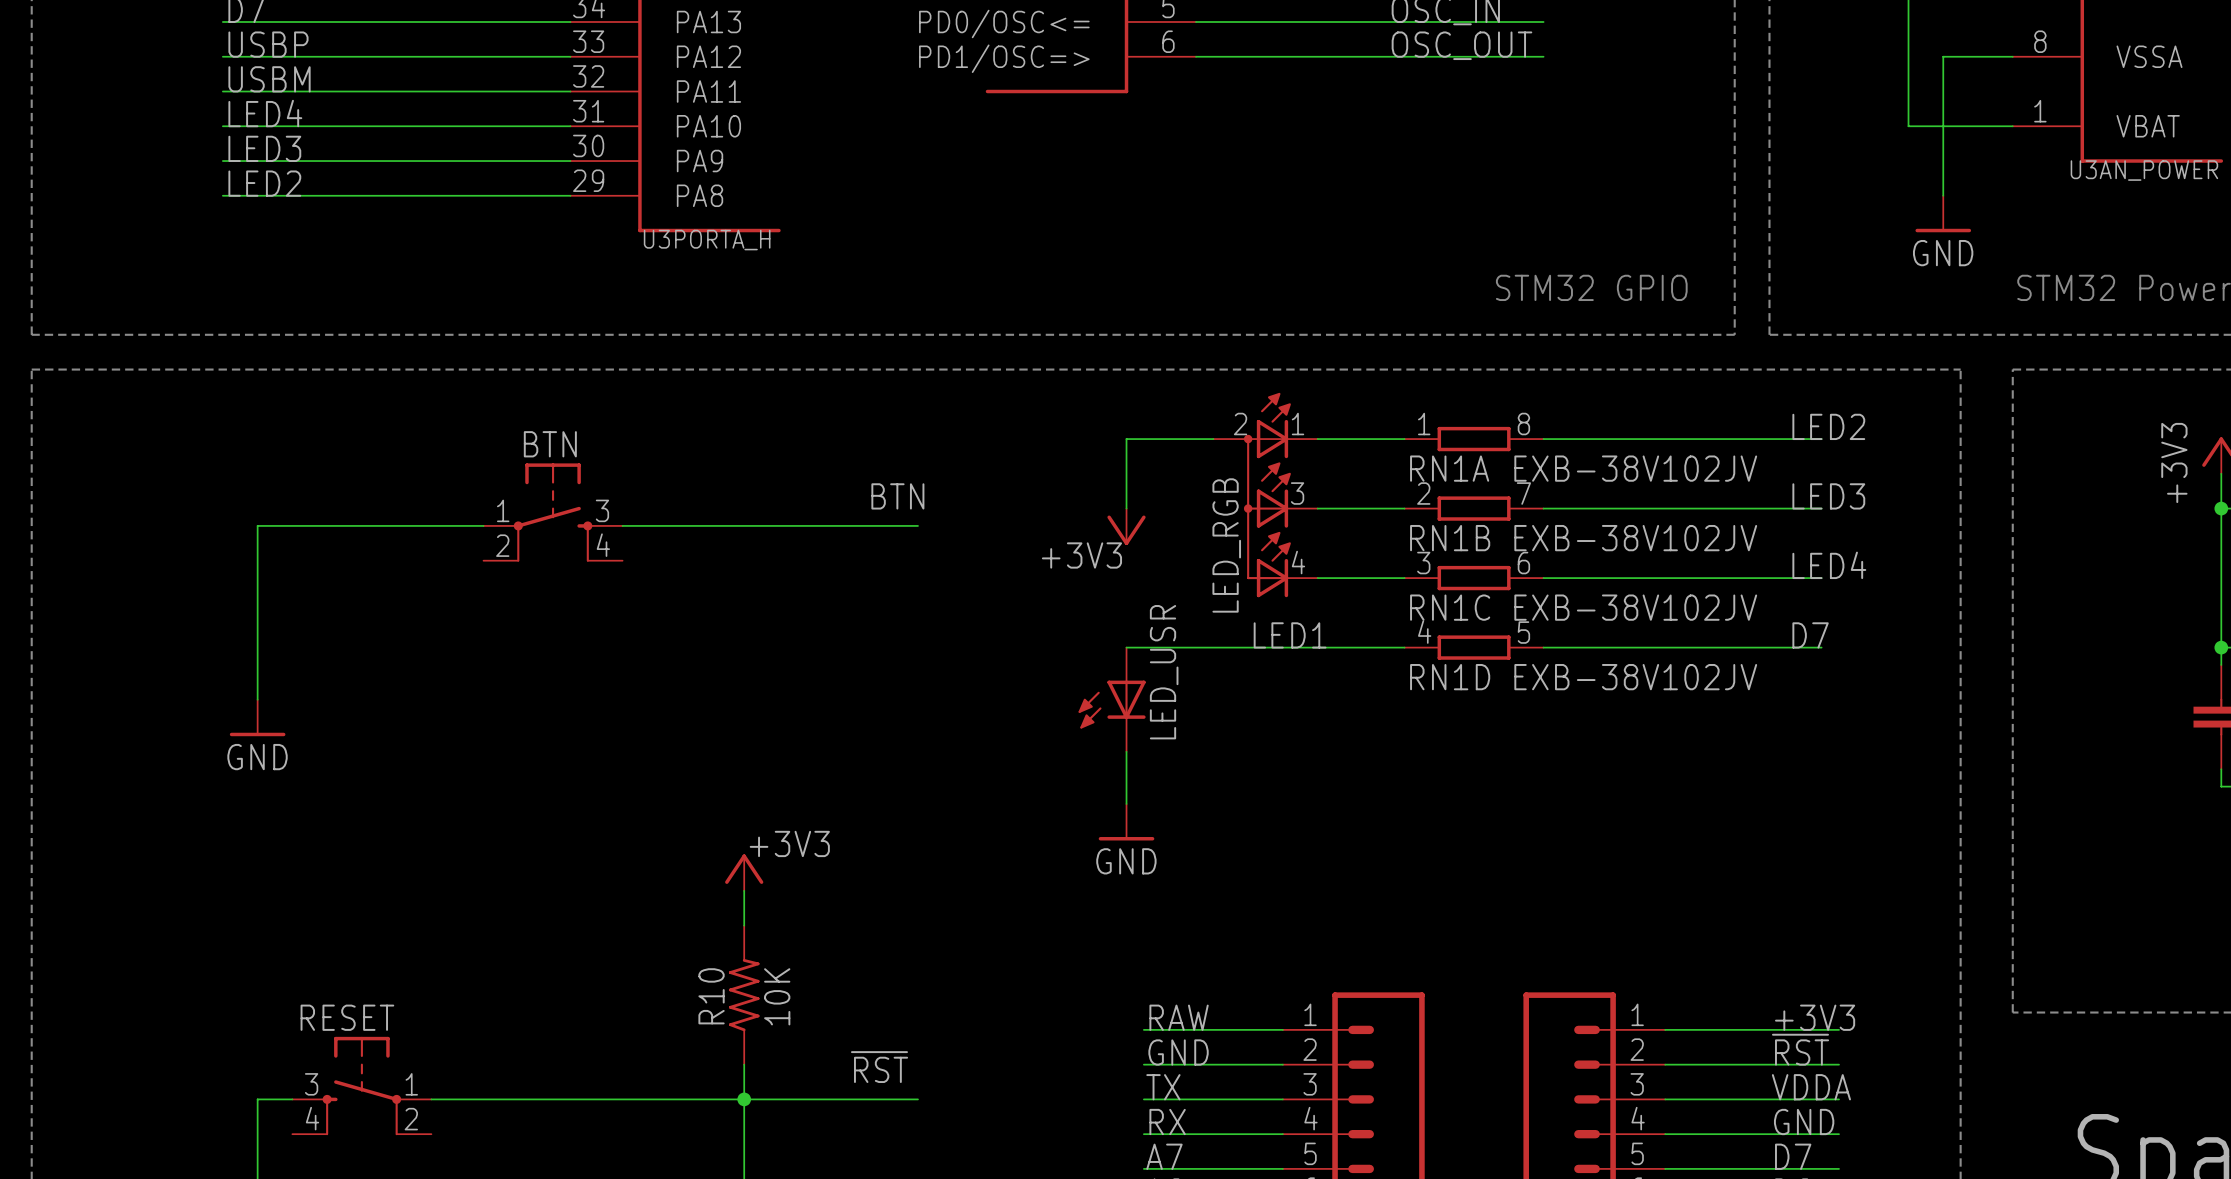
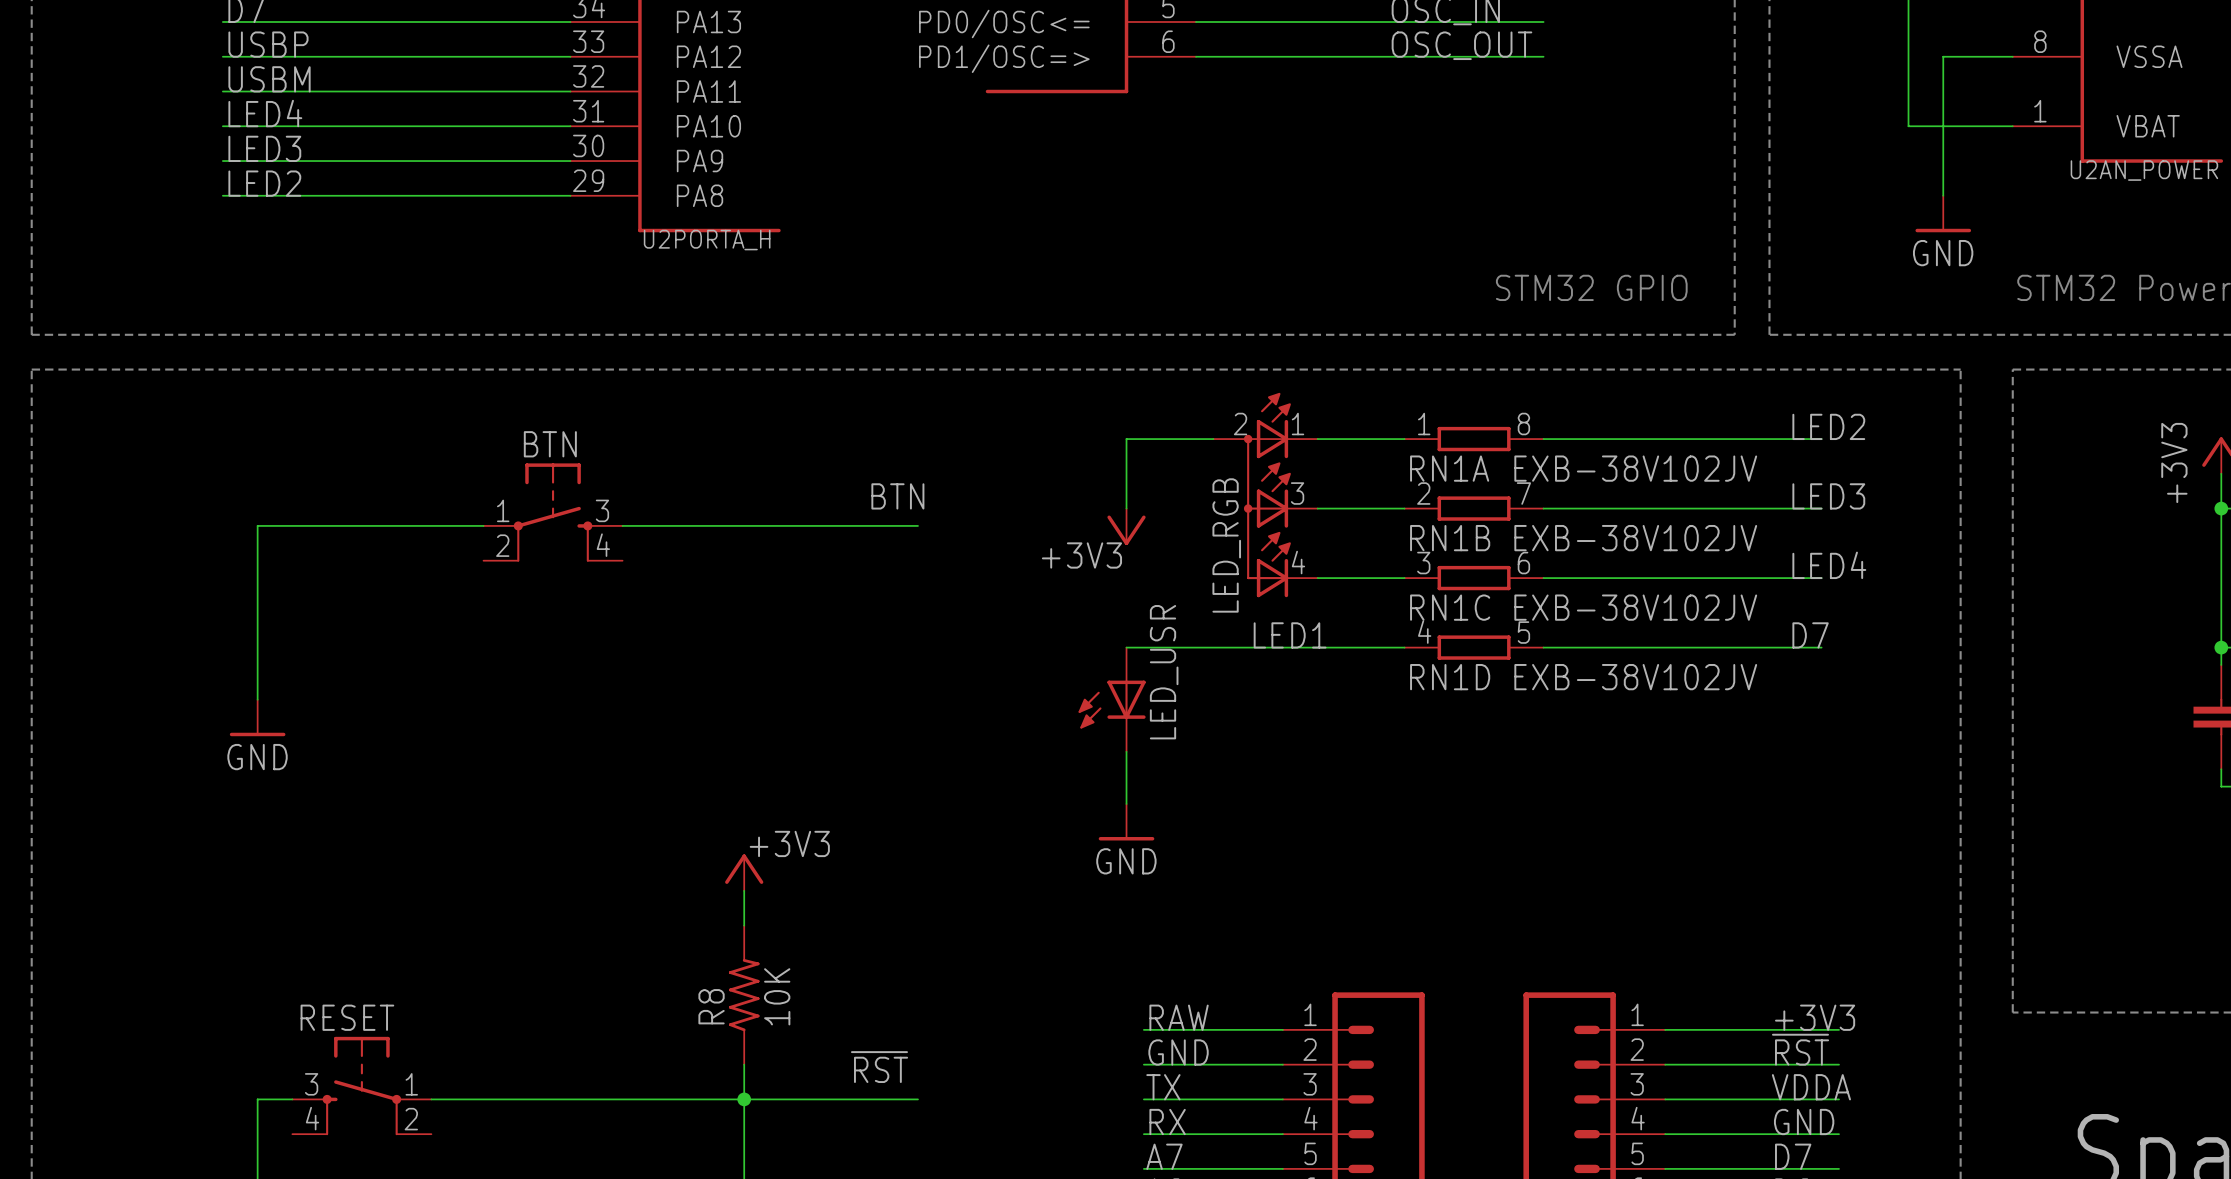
U3AN_POWER name: U3AN_POWER (2144, 170) -> U2AN_POWER (2144, 170)
U3PORTA_H name: U3PORTA_H (707, 240) -> U2PORTA_H (707, 240)
R10 name: R10 (711, 996) -> R8 (711, 1006)

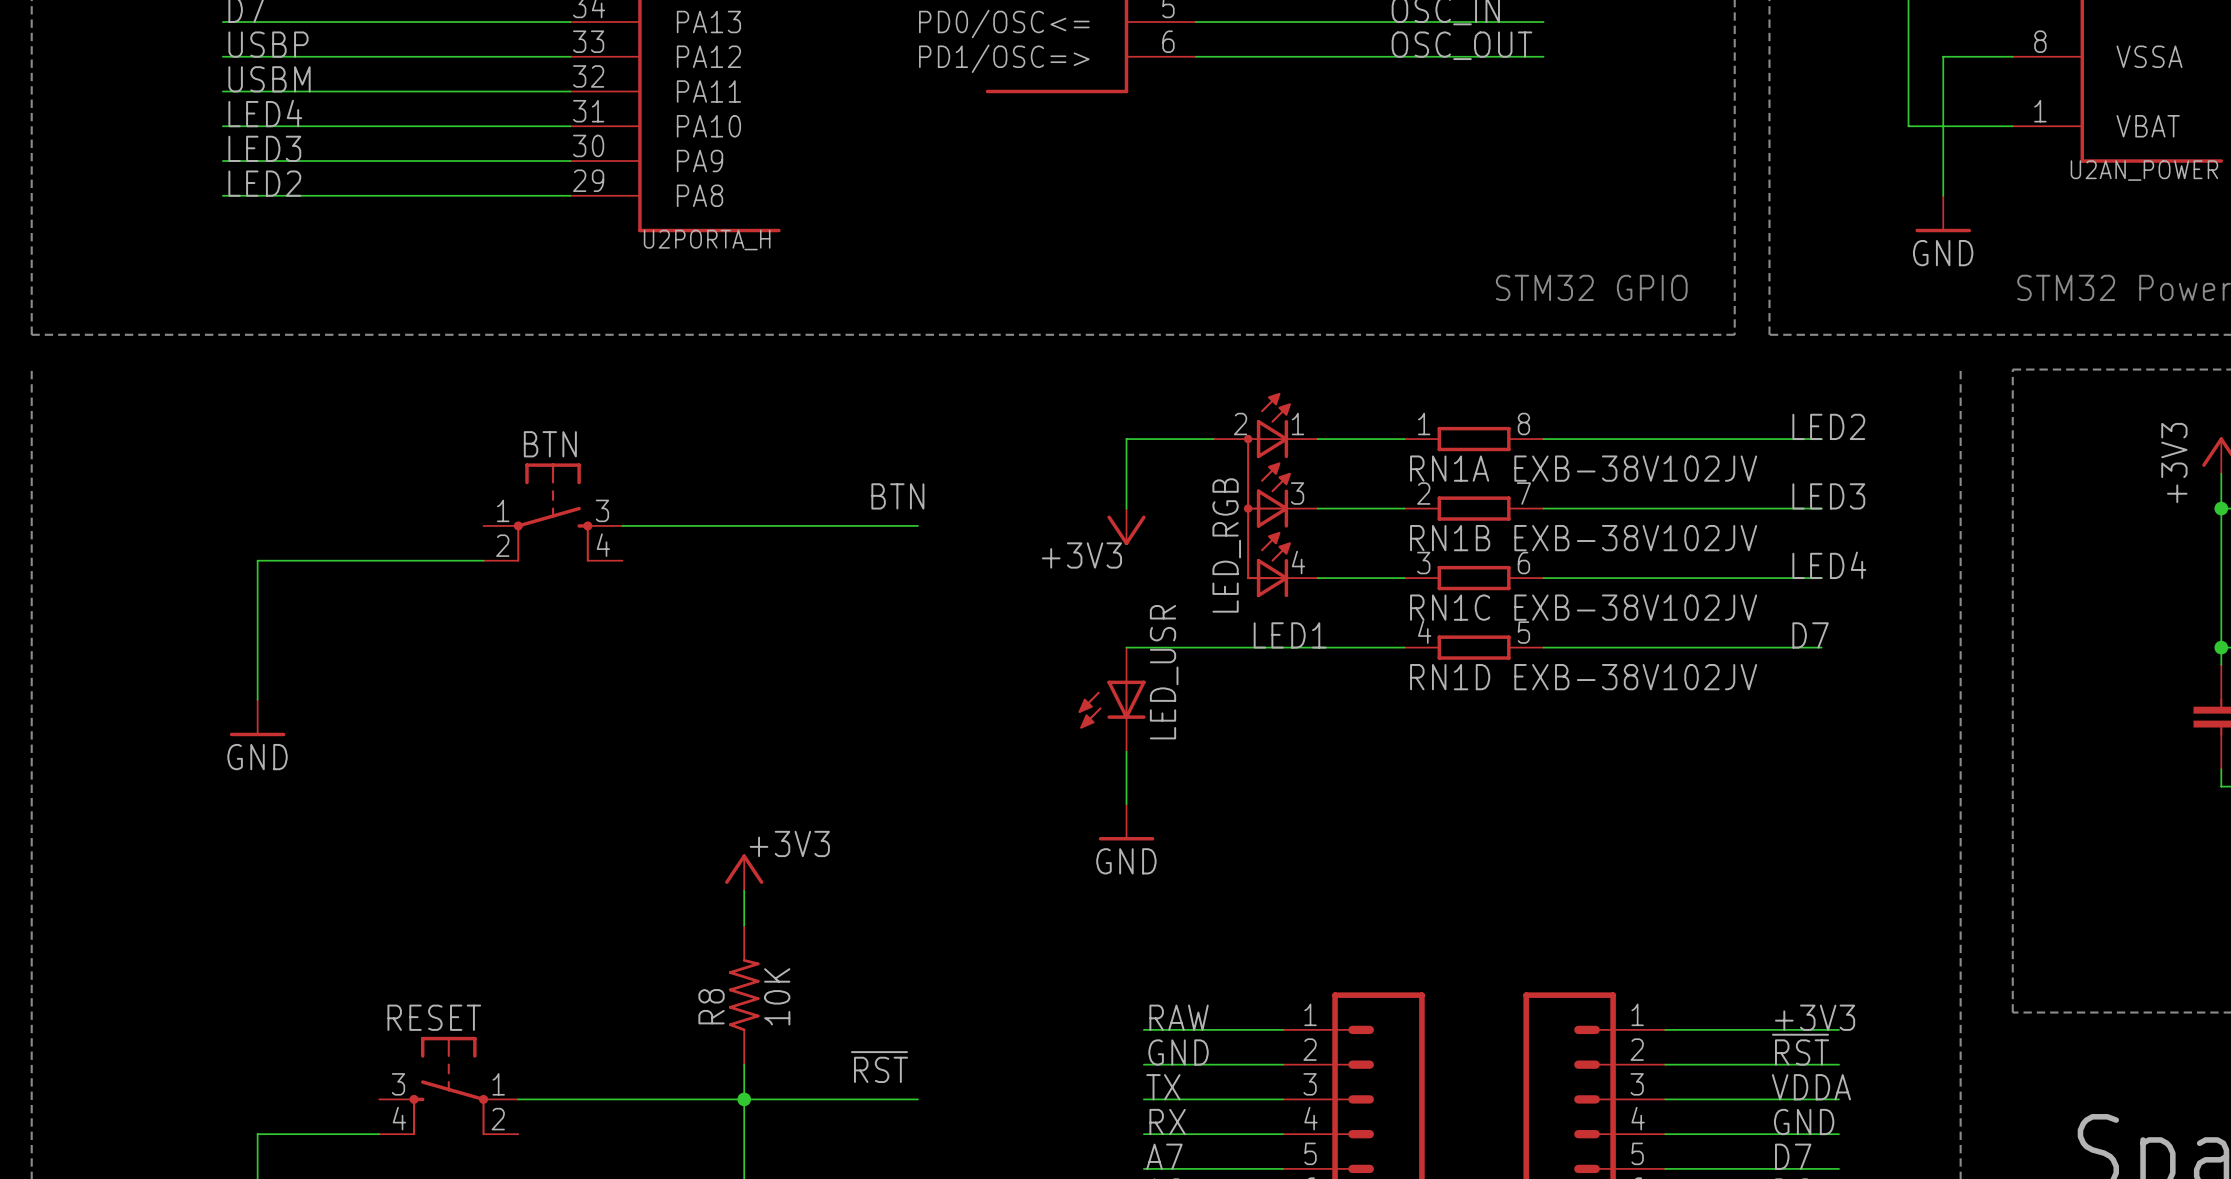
line: (31, 369) (1960, 369) -> none
wire: (483, 525) (257, 525) (257, 560) -> (483, 560) (257, 560)
RESET position: (361, 1086) -> (448, 1086)
wire: (292, 1099) (257, 1099) (257, 1134) -> (379, 1134) (257, 1134)
wire: (431, 1099) (518, 1099) -> none

